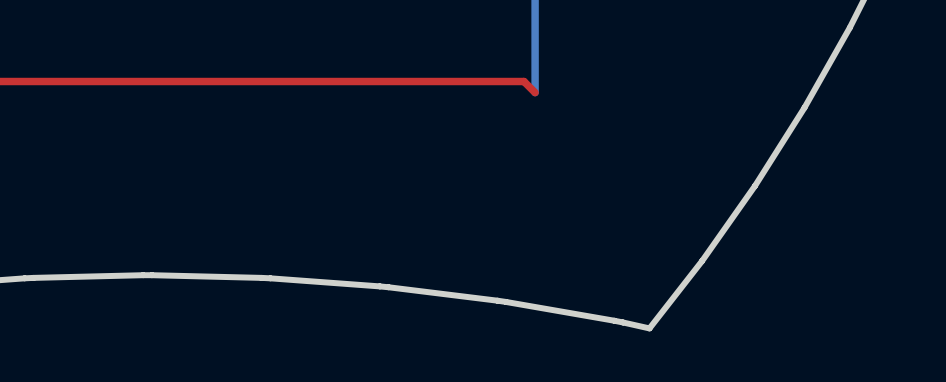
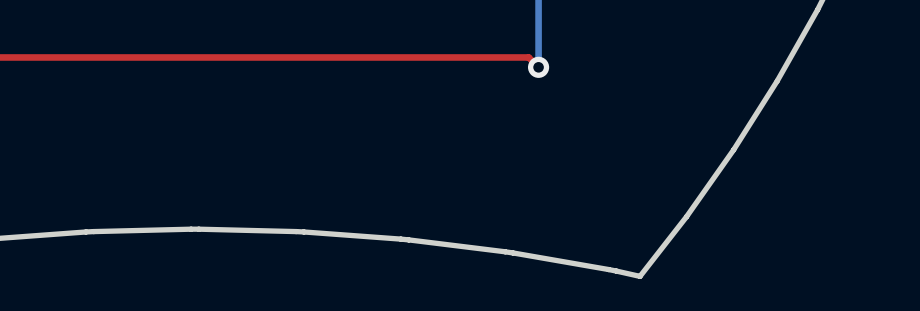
via: none -> (538, 67)

